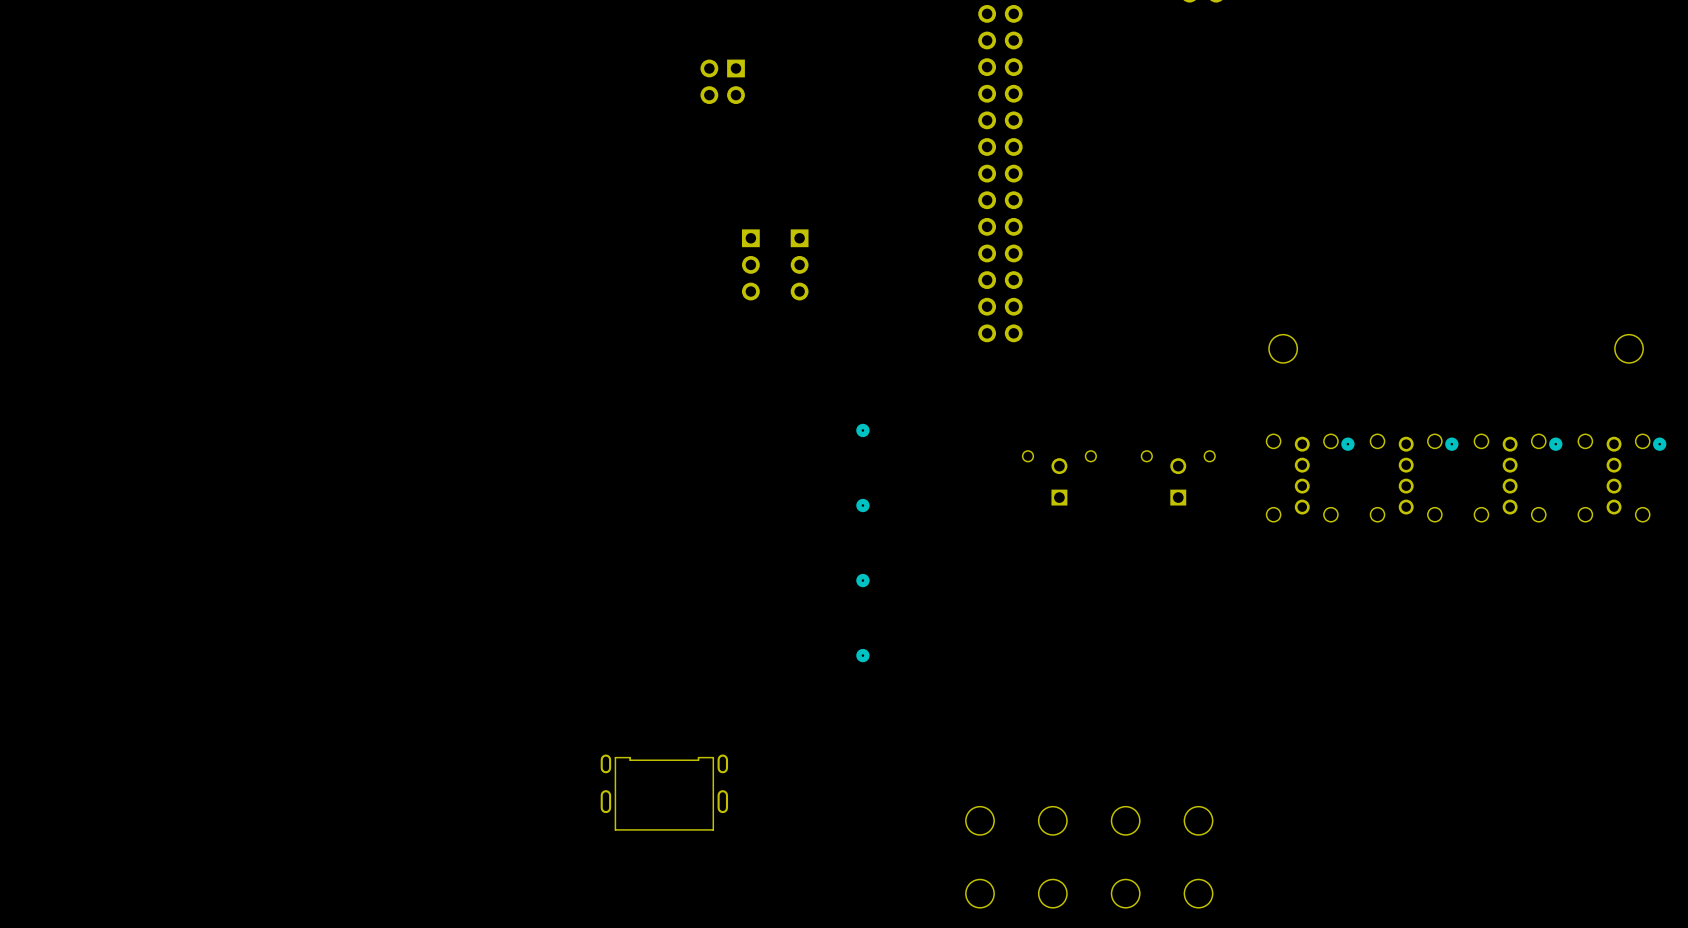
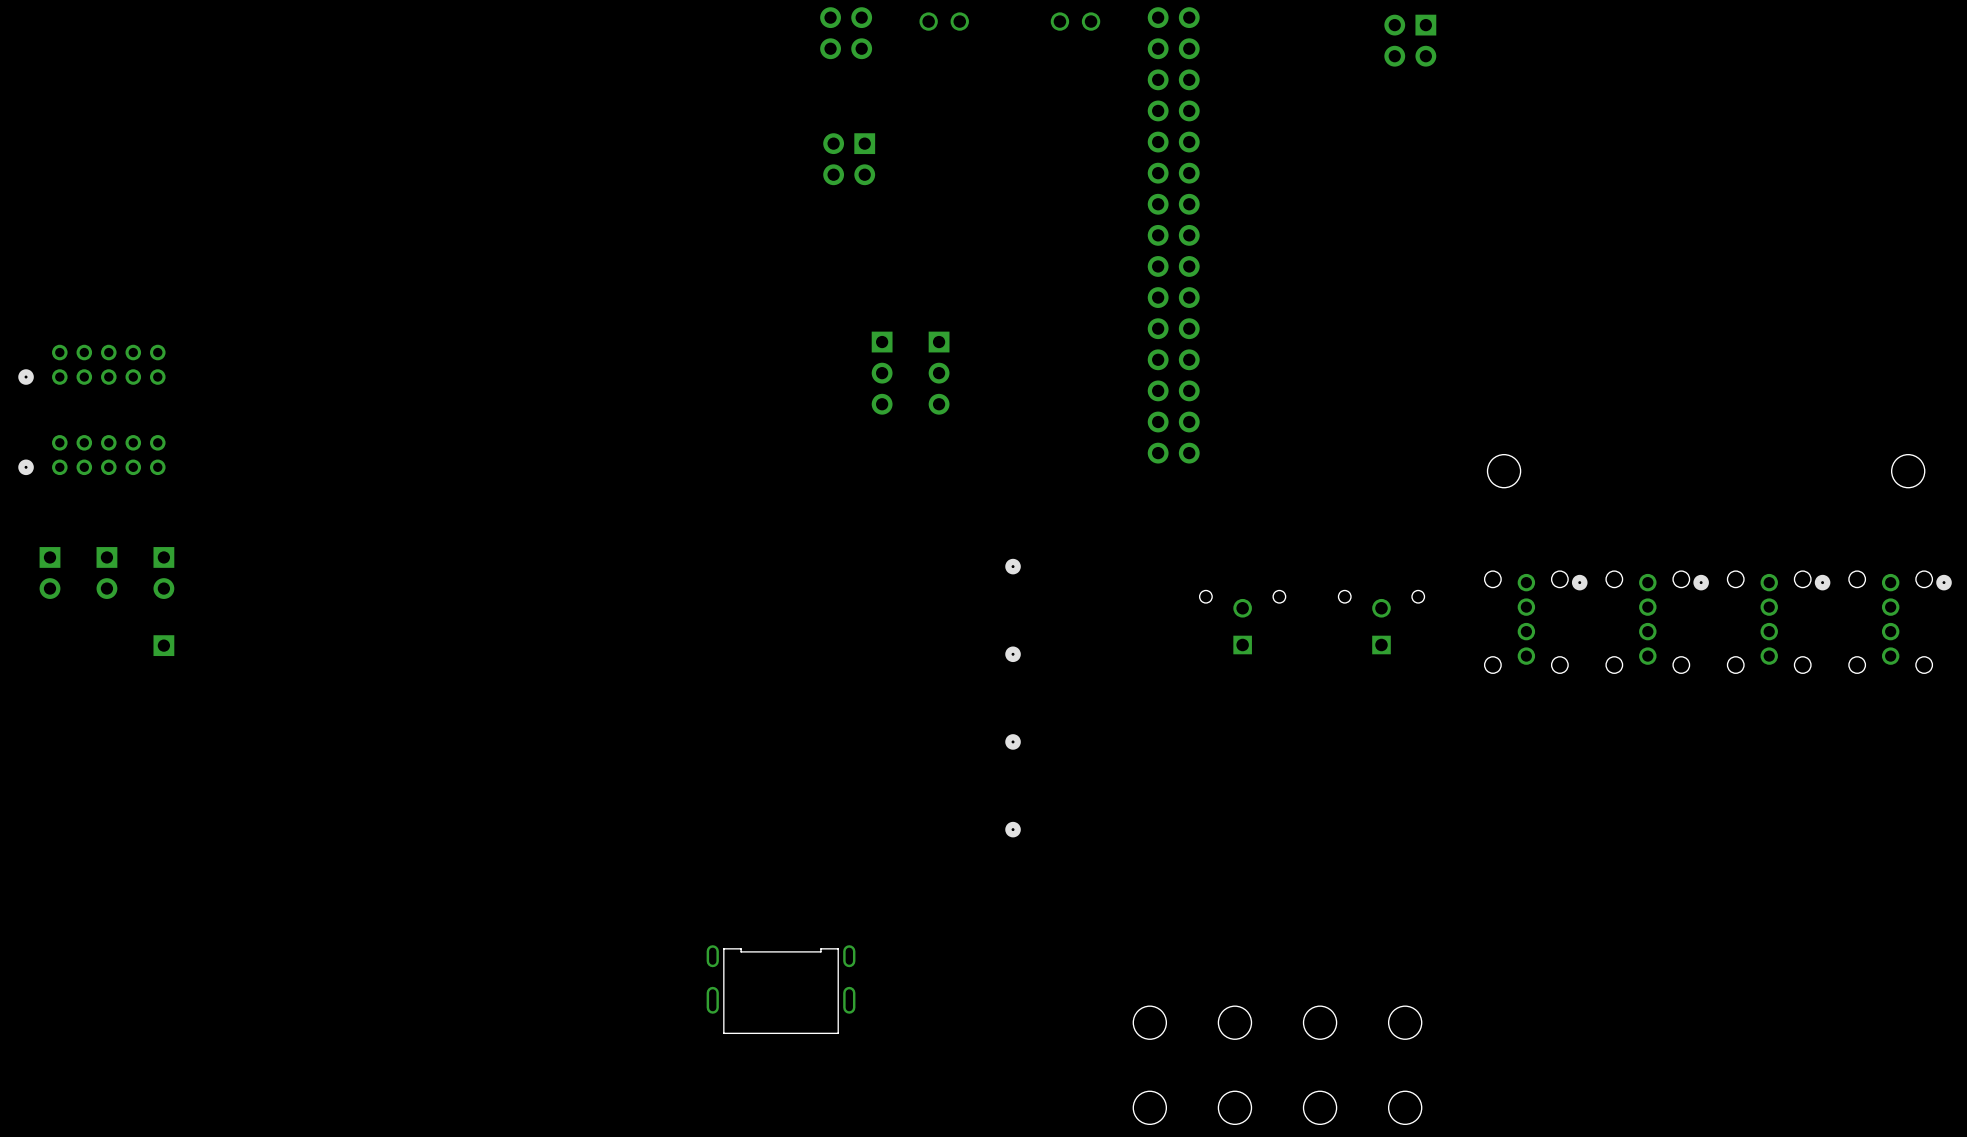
part: none -> (91, 364)
part: none -> (91, 455)
part: none -> (50, 573)
part: none -> (106, 573)
part: none -> (163, 573)
part: none -> (163, 645)

